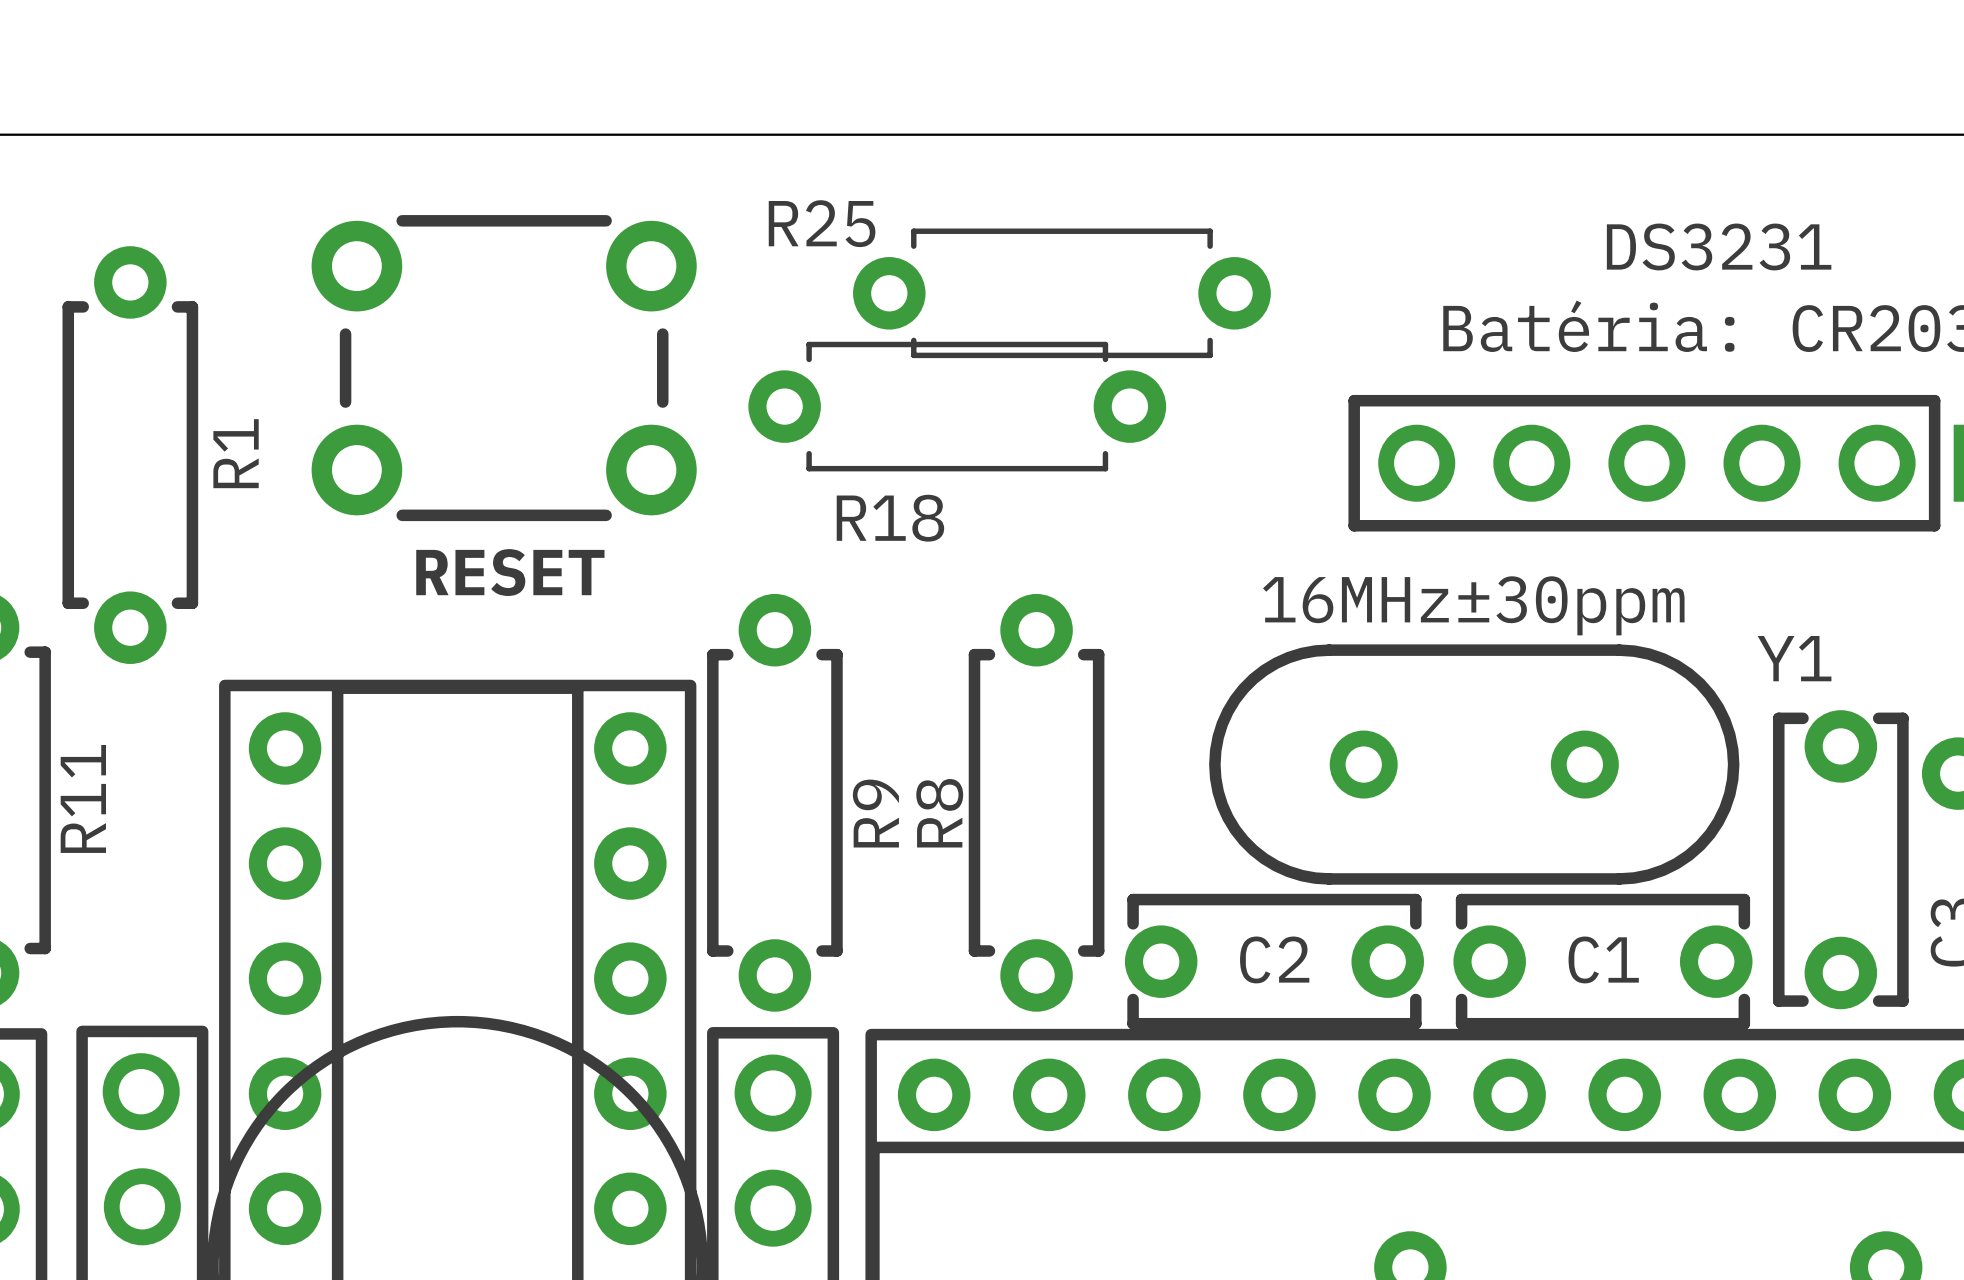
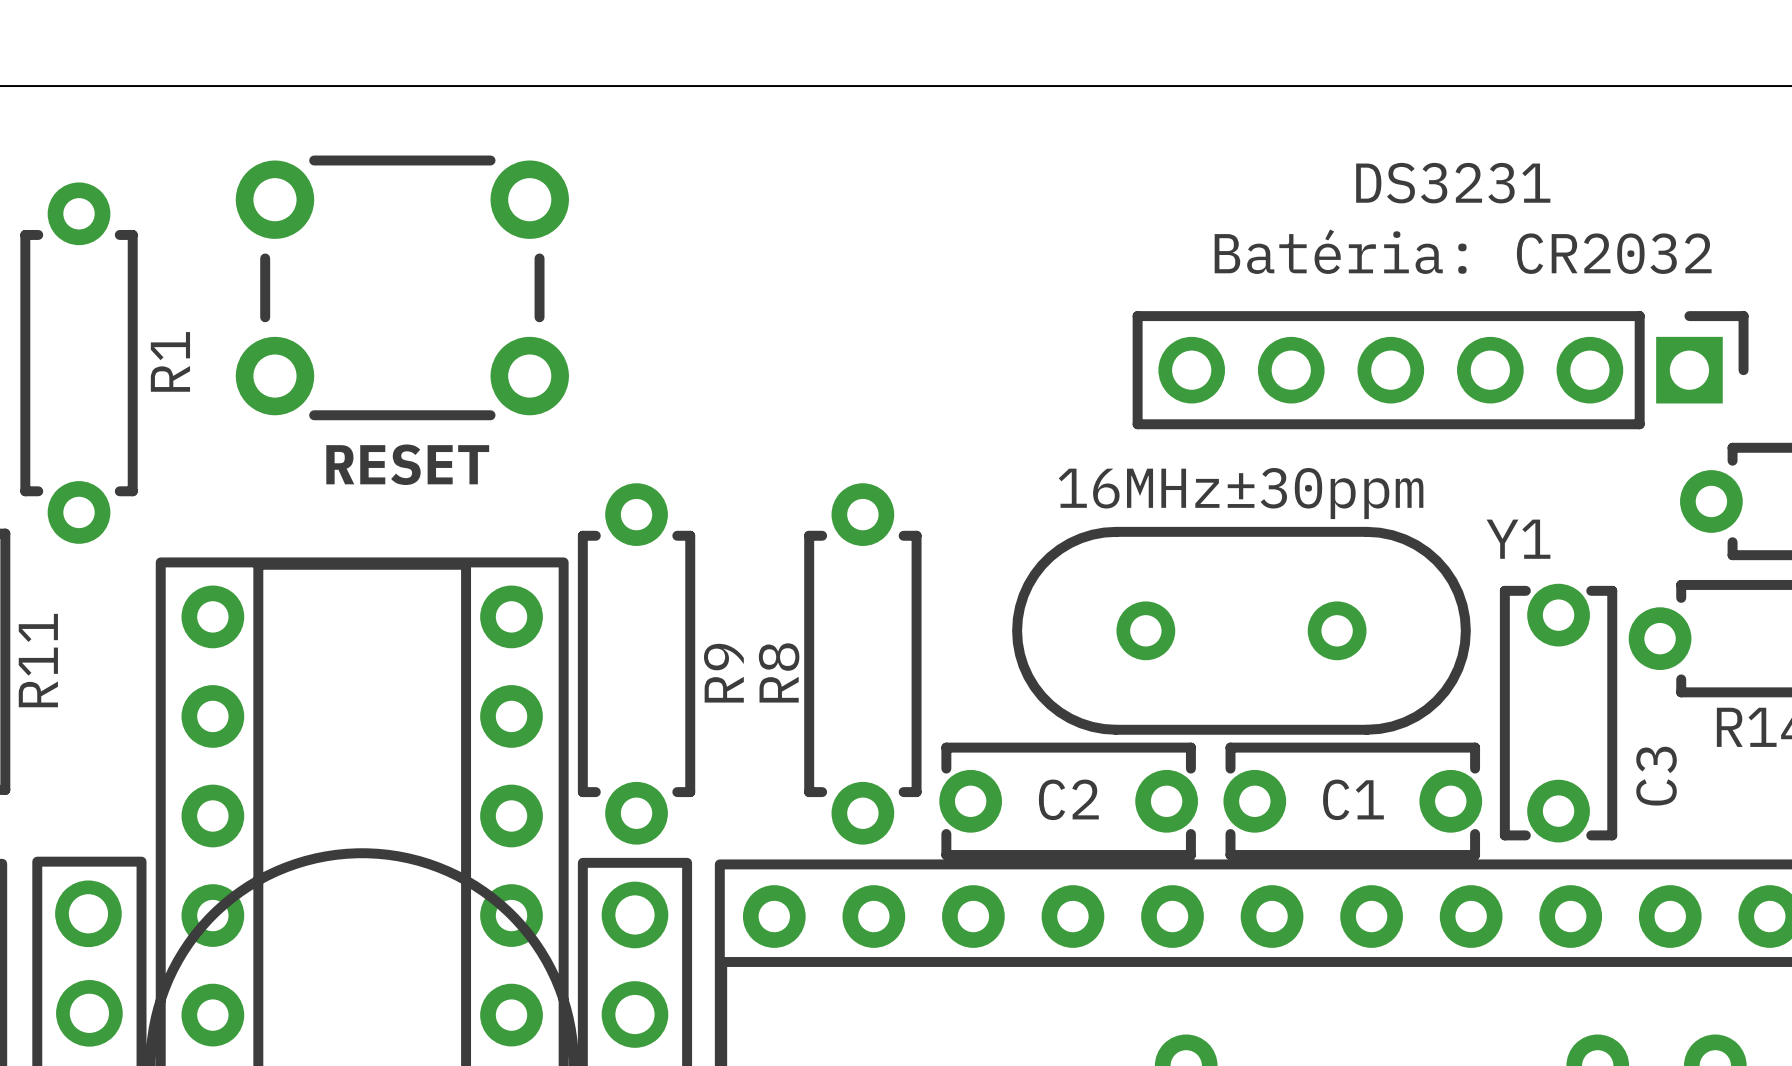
R25: (1061, 293) -> none
R18: (957, 406) -> none

